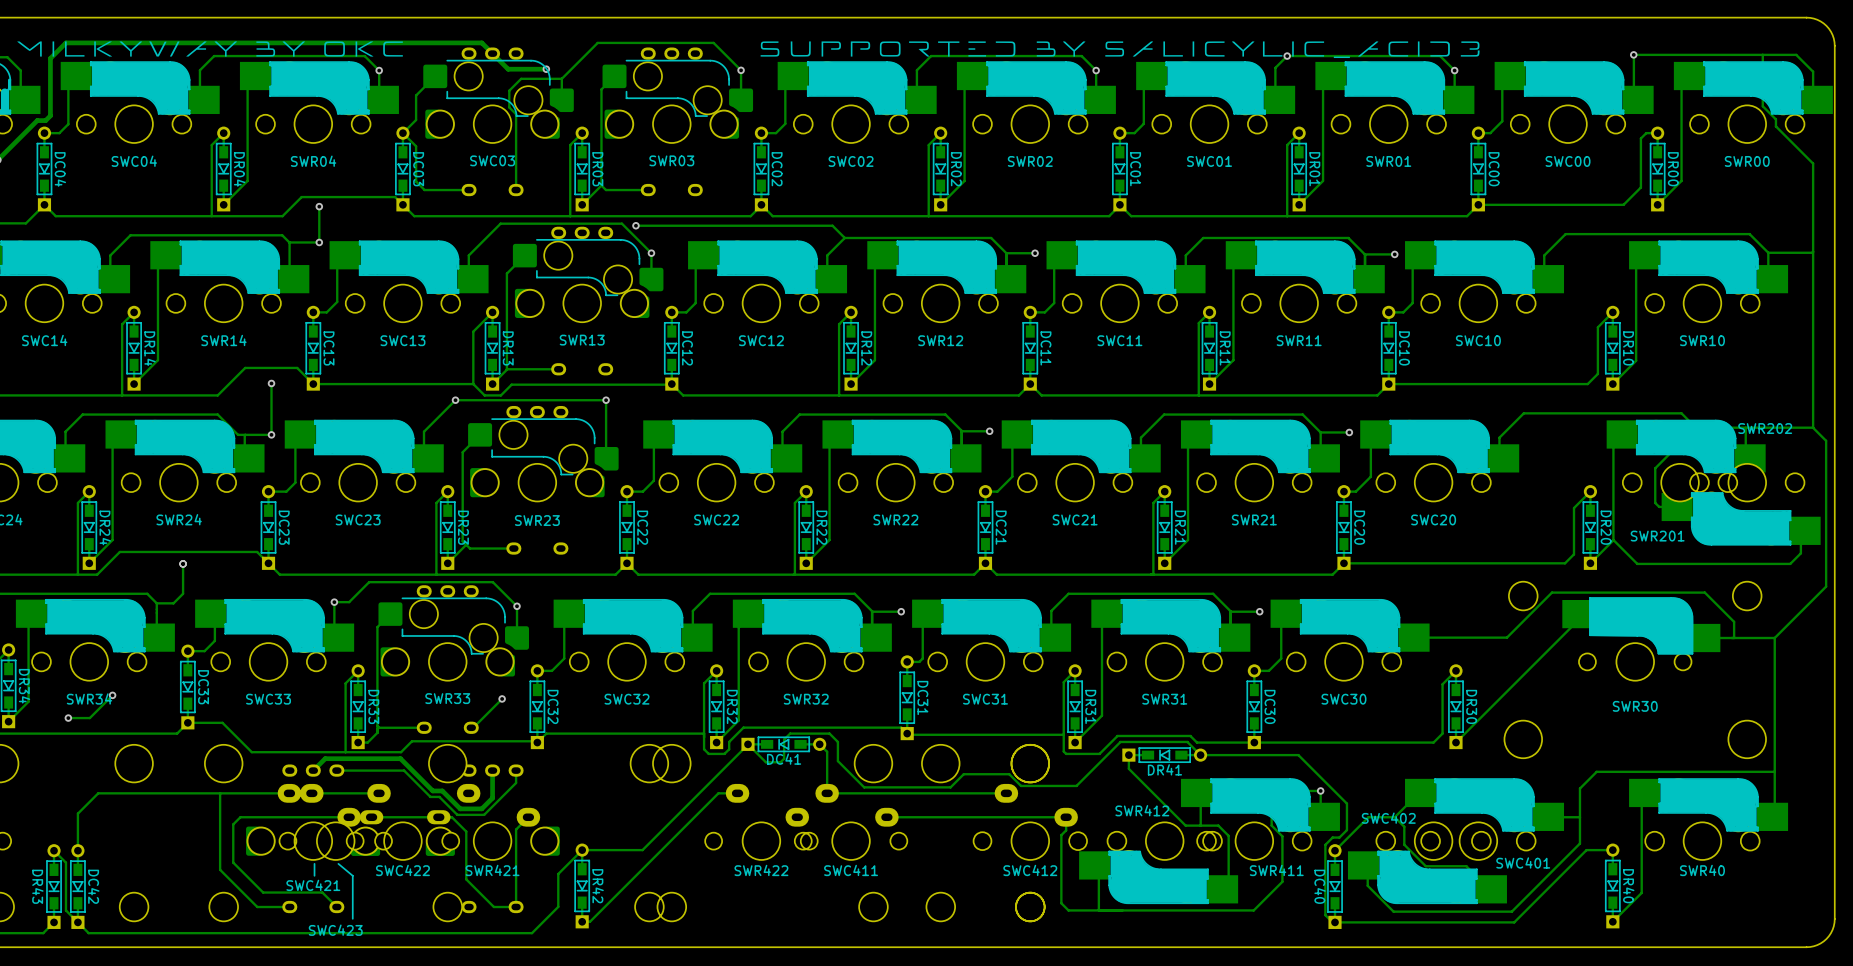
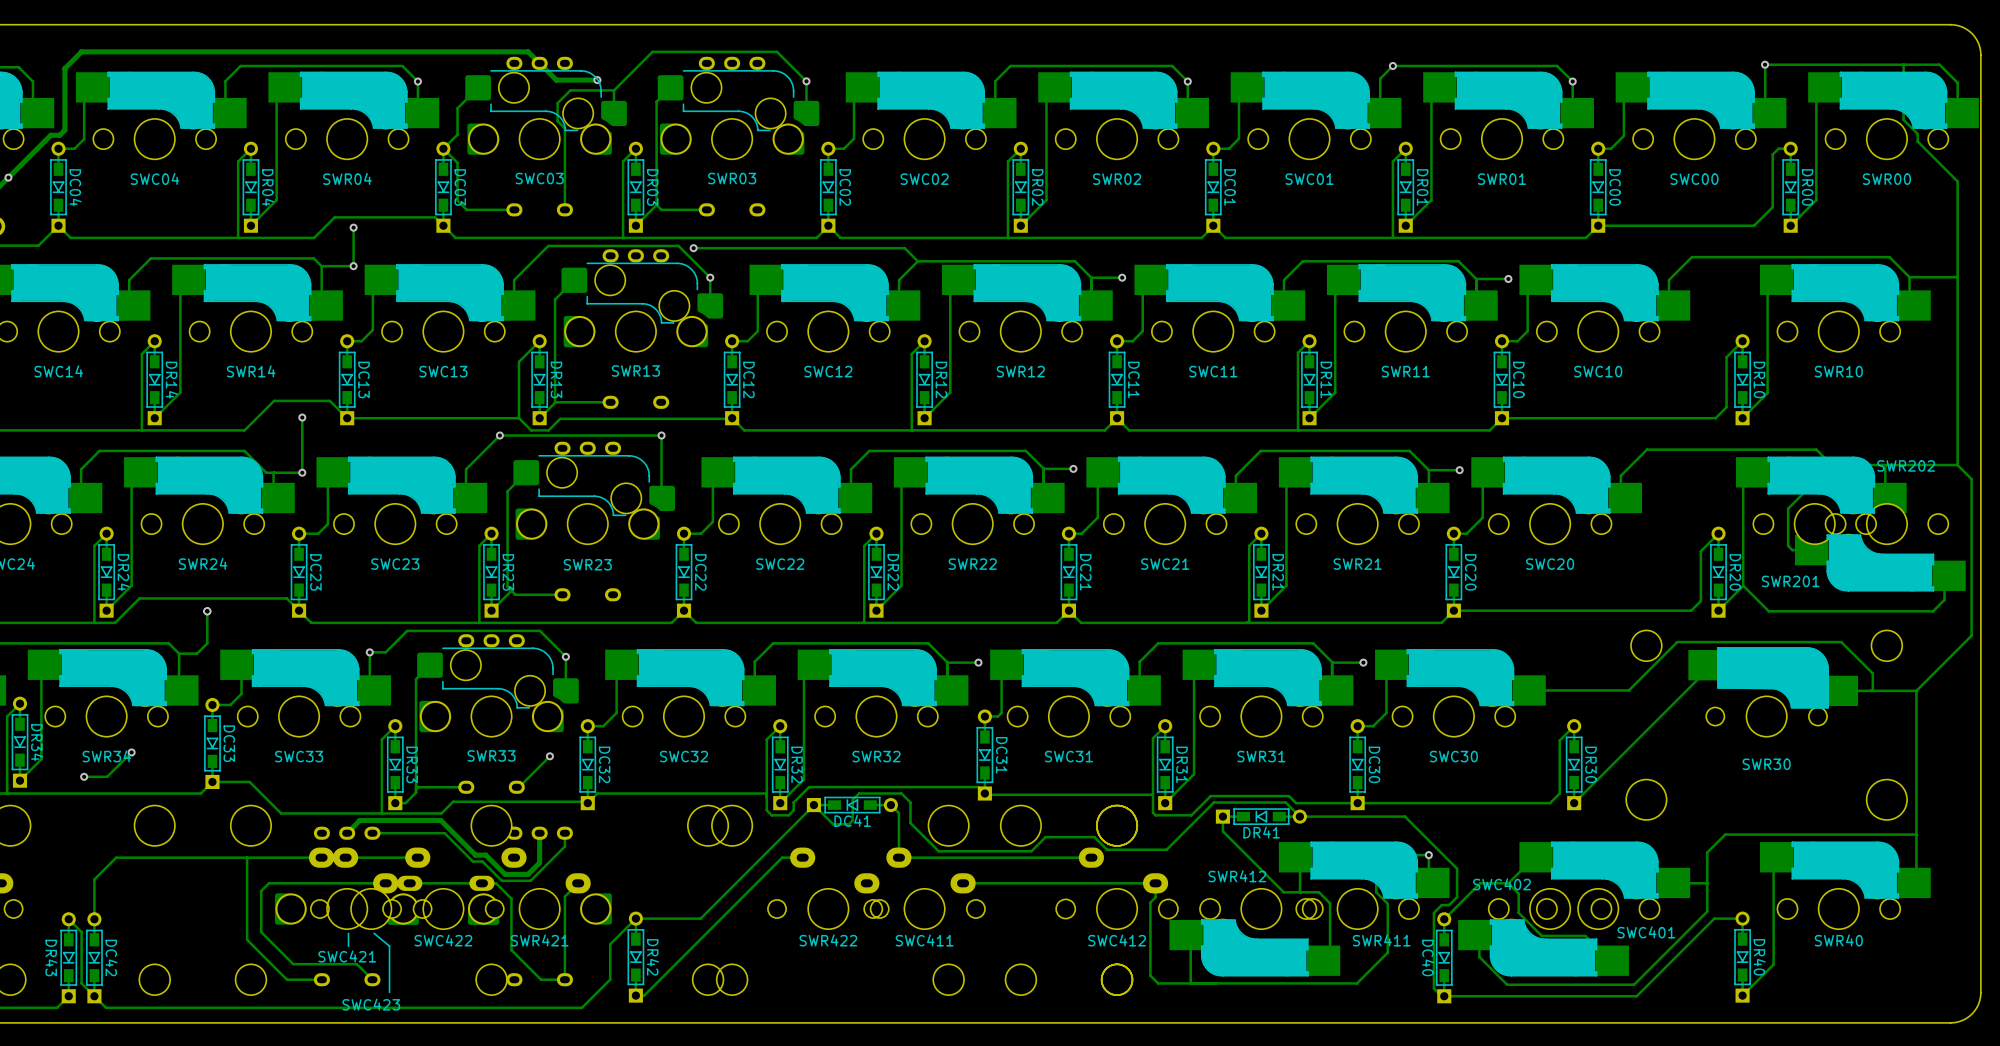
drawing: [17, 41, 403, 57] -> none
drawing: [760, 41, 1480, 59] -> none

